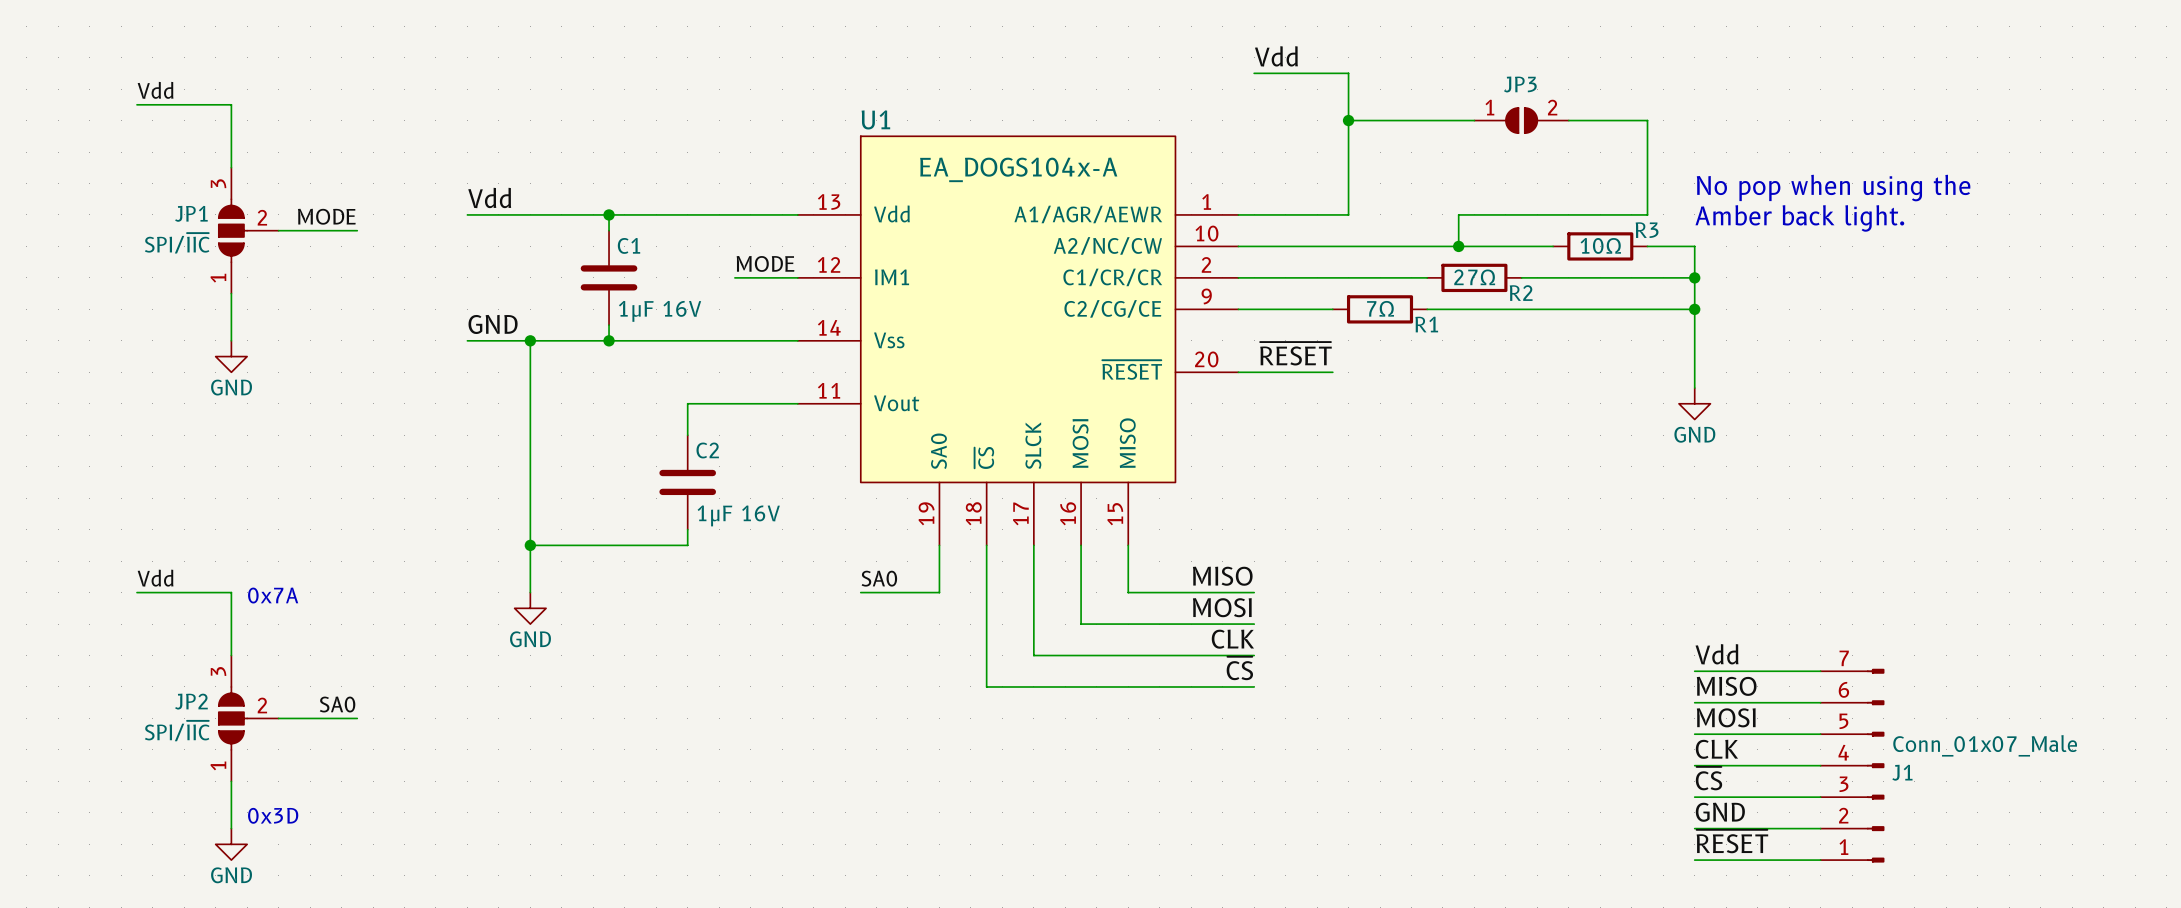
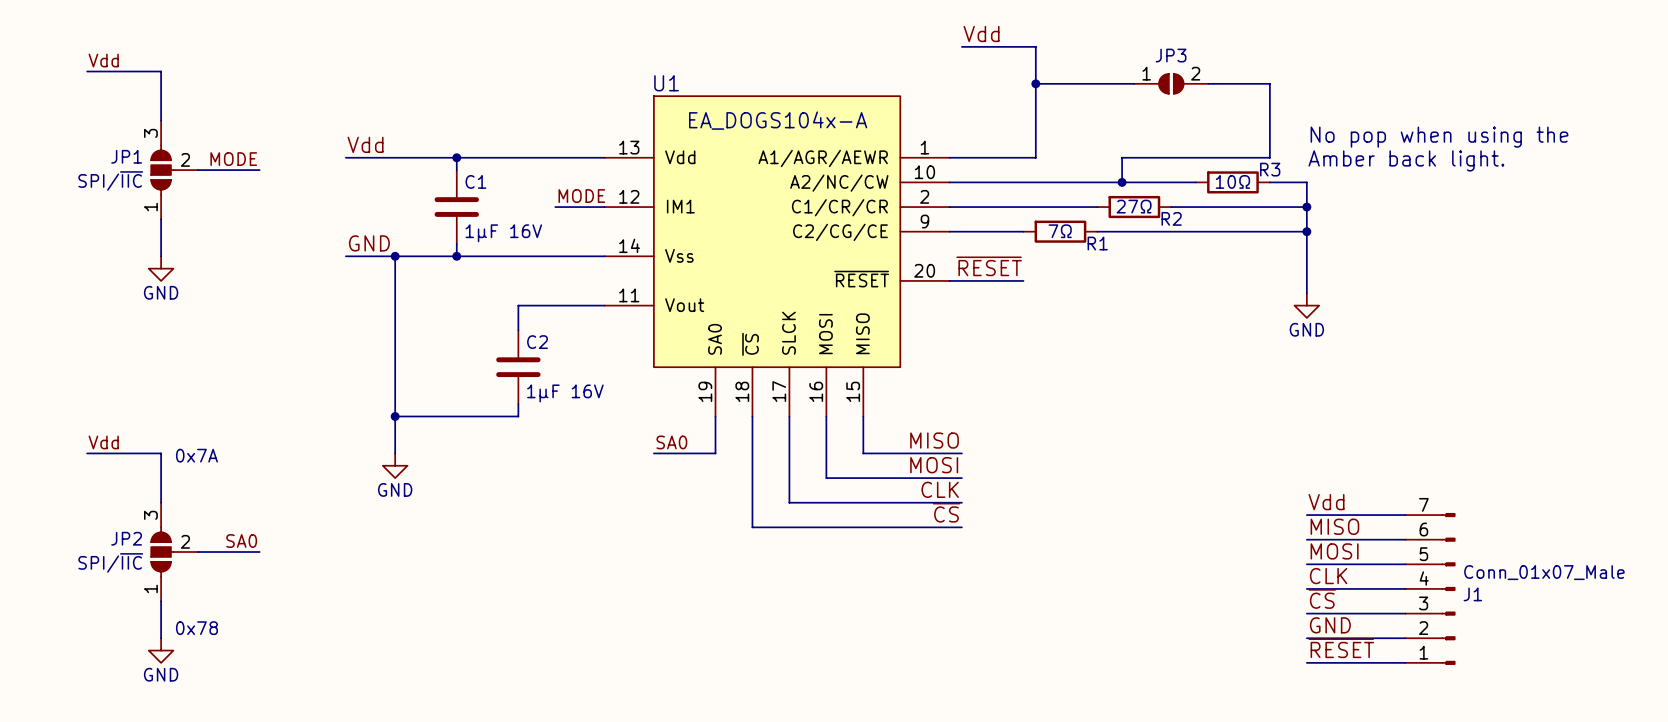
text: 0x3D (273, 815) -> 0x78 (196, 628)

